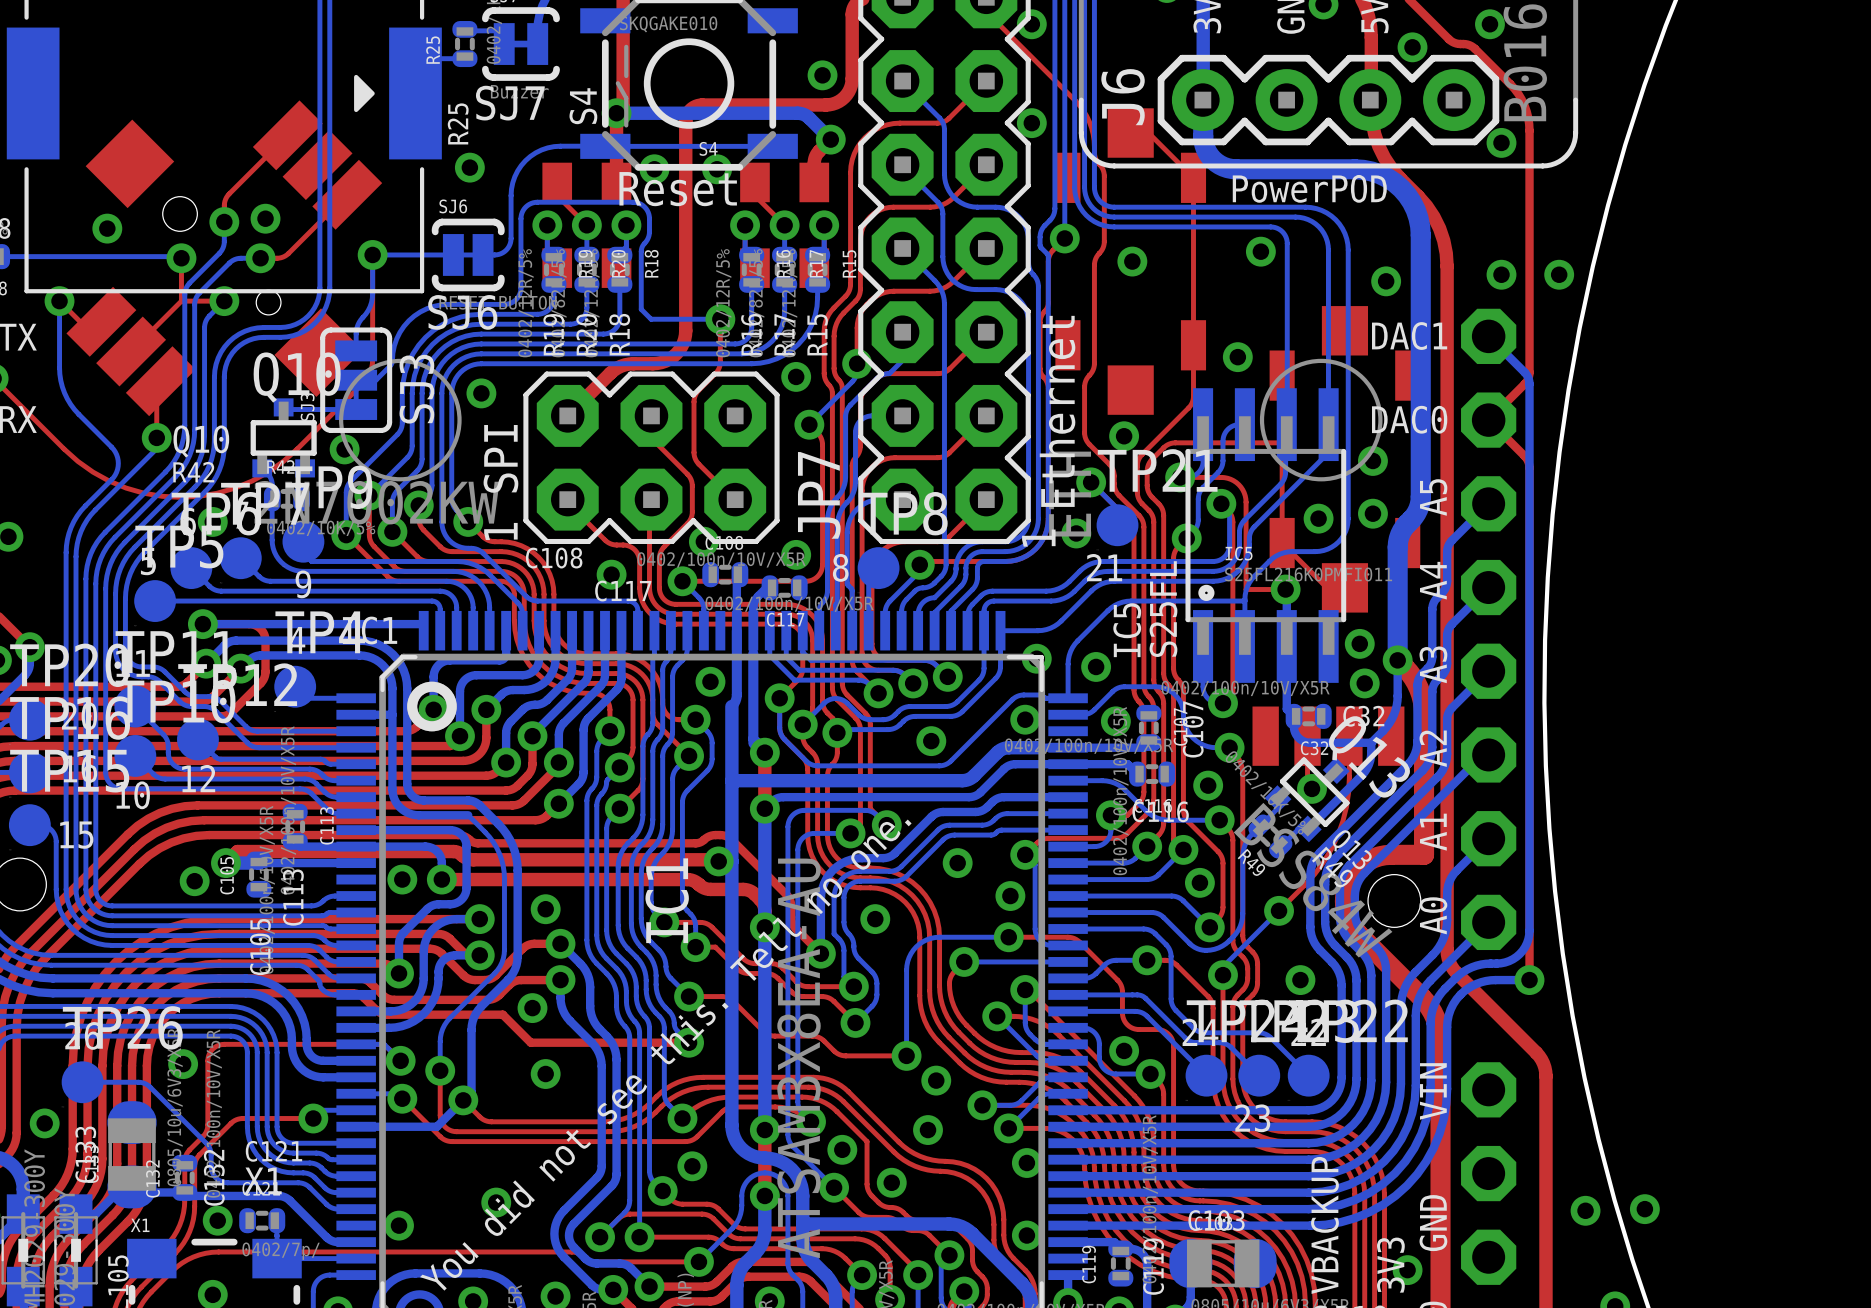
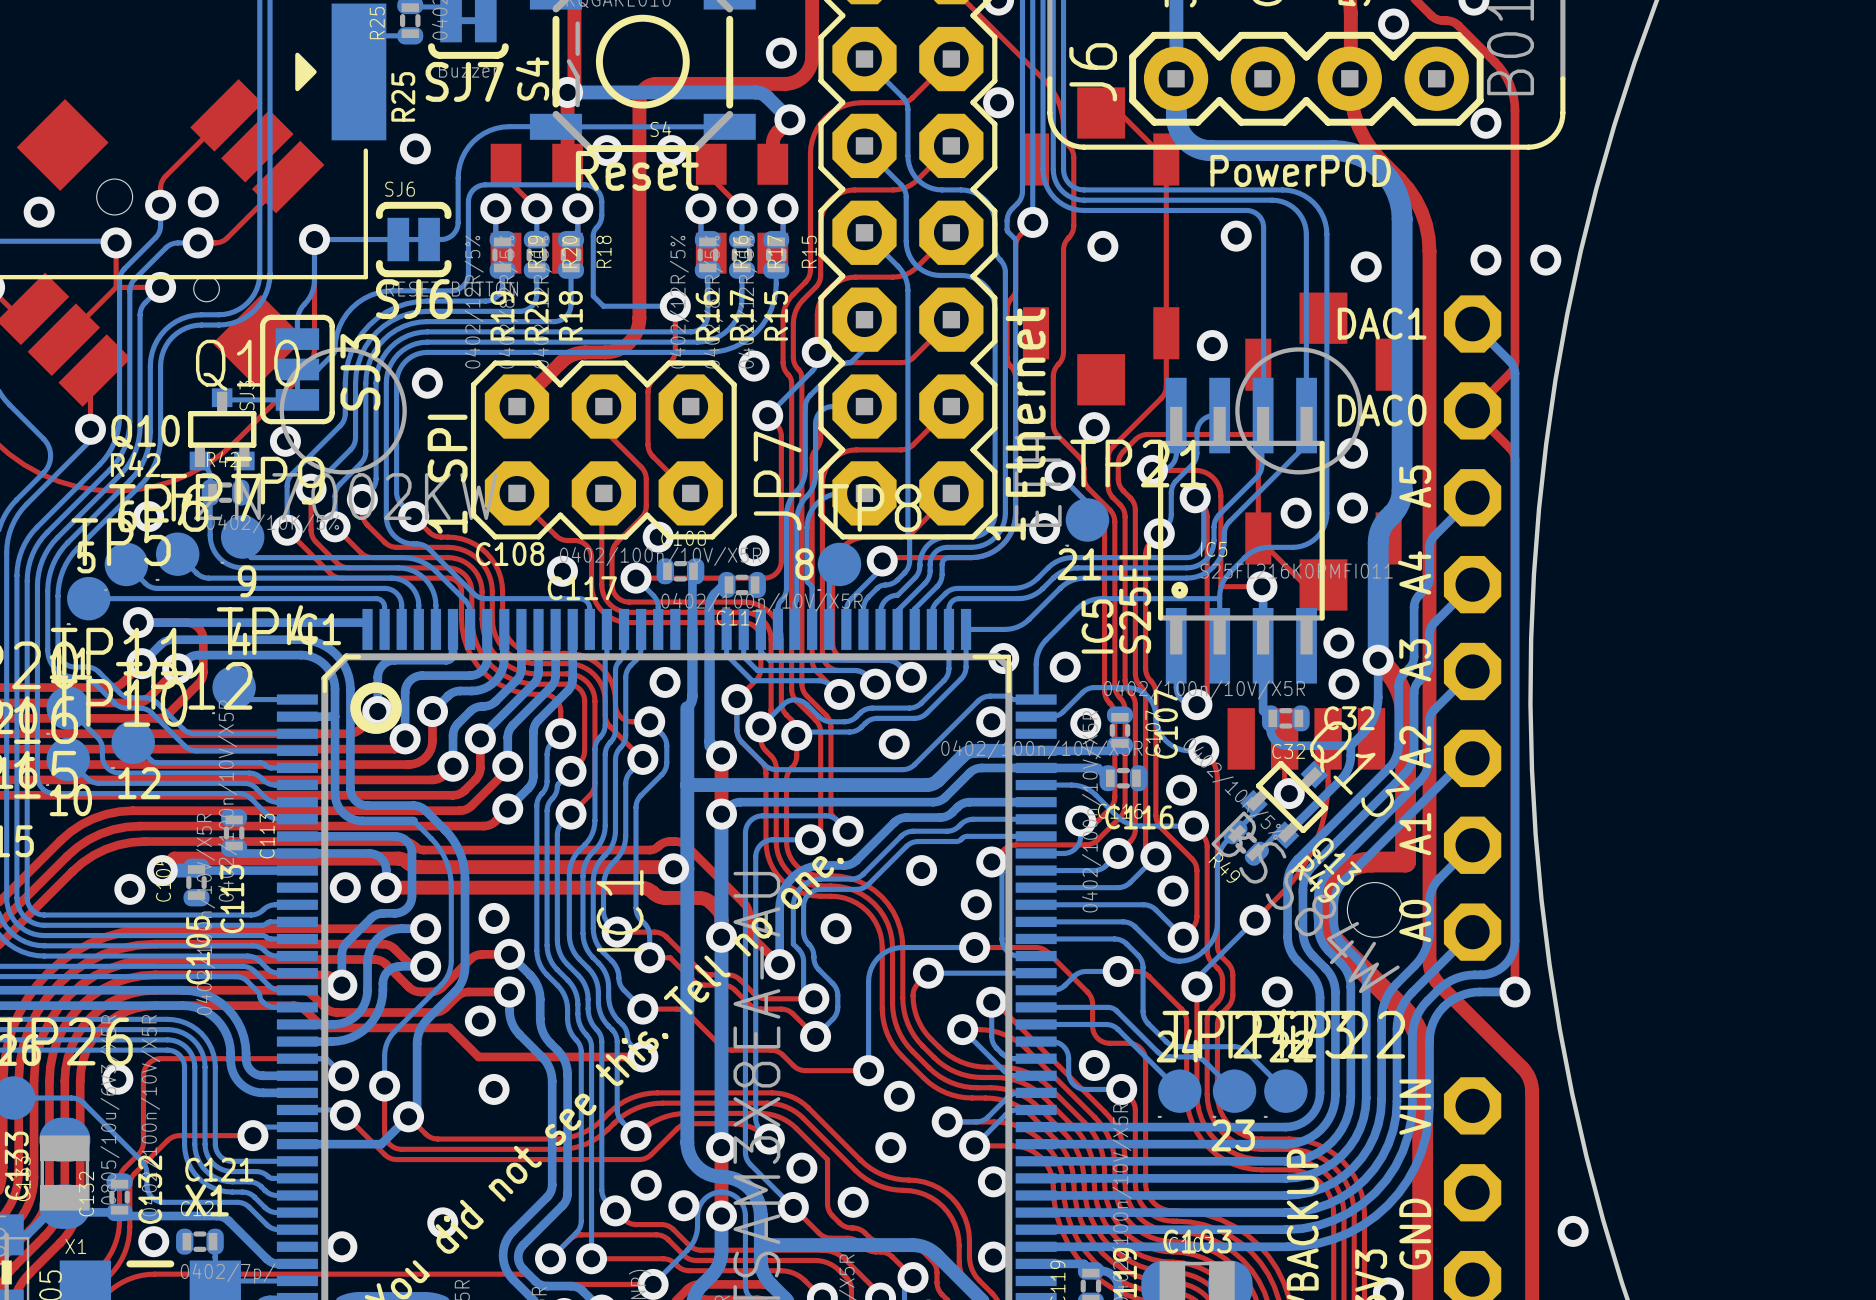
via: none -> (683, 1205)
via: (1644, 1209) -> none

